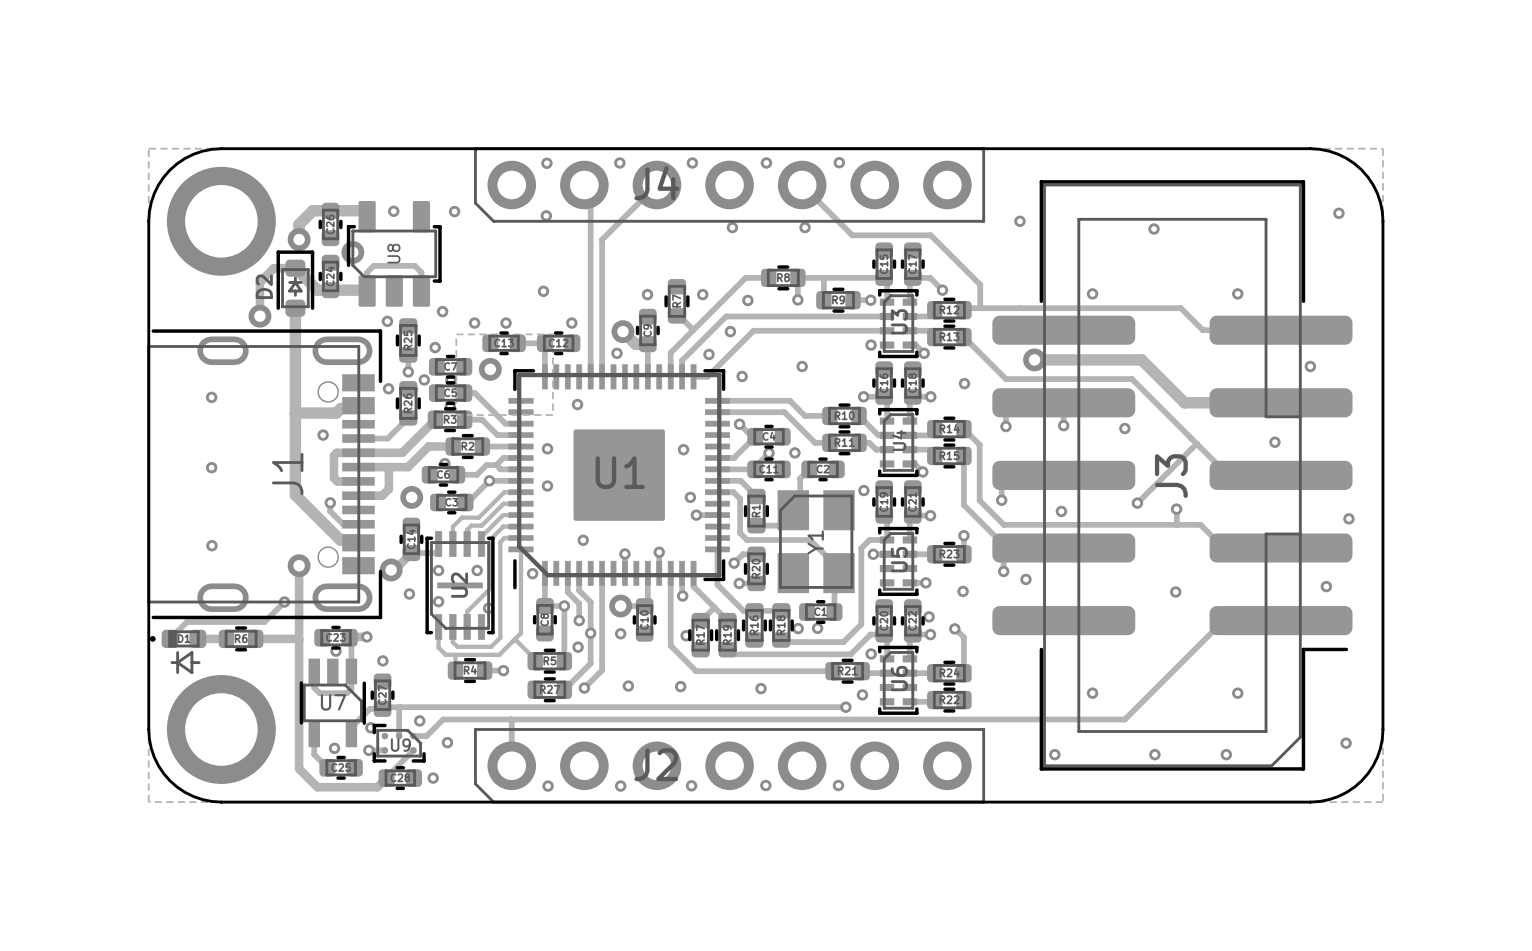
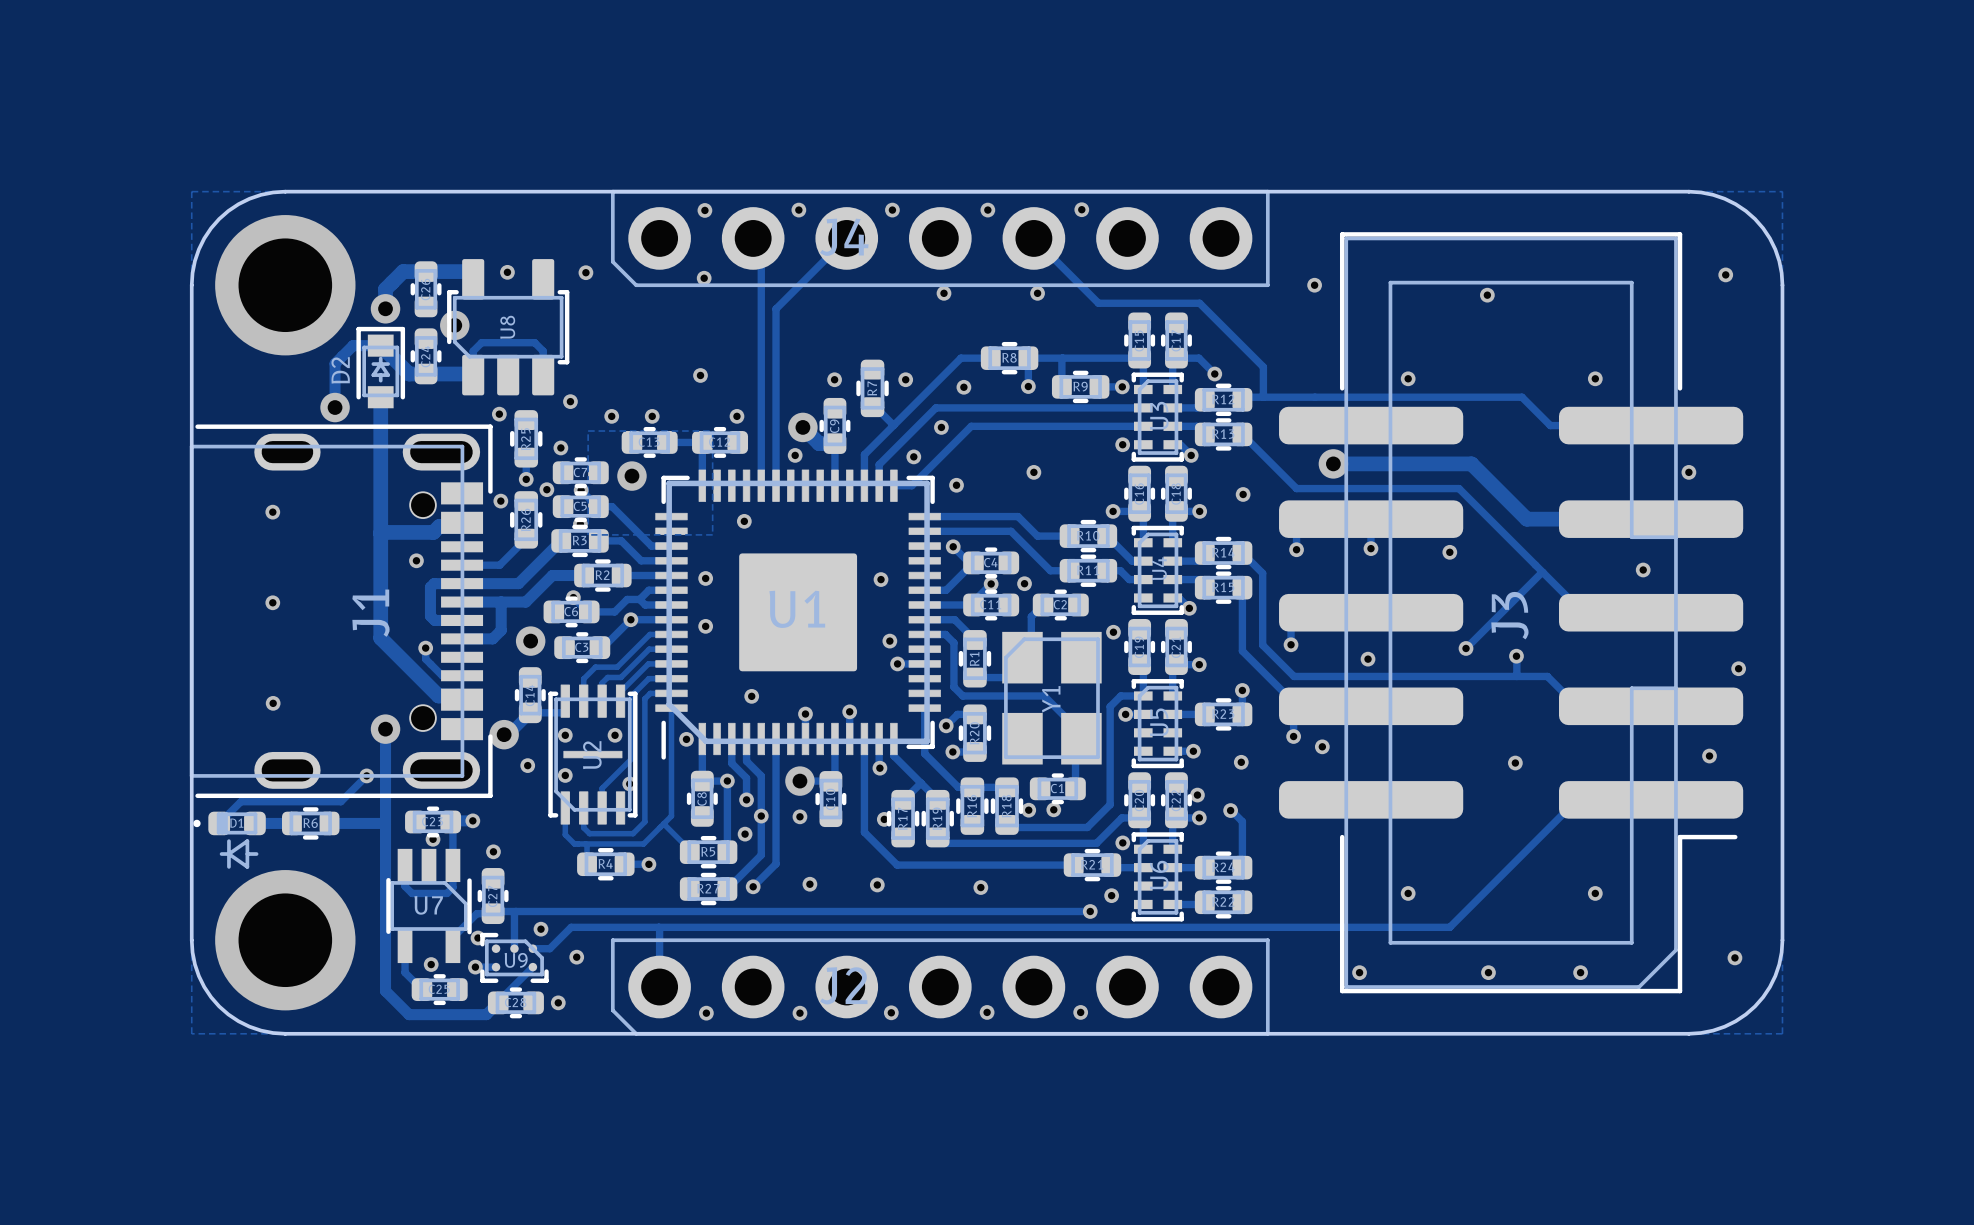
D2 footprint: [276, 250, 315, 317] -> [356, 326, 406, 409]

